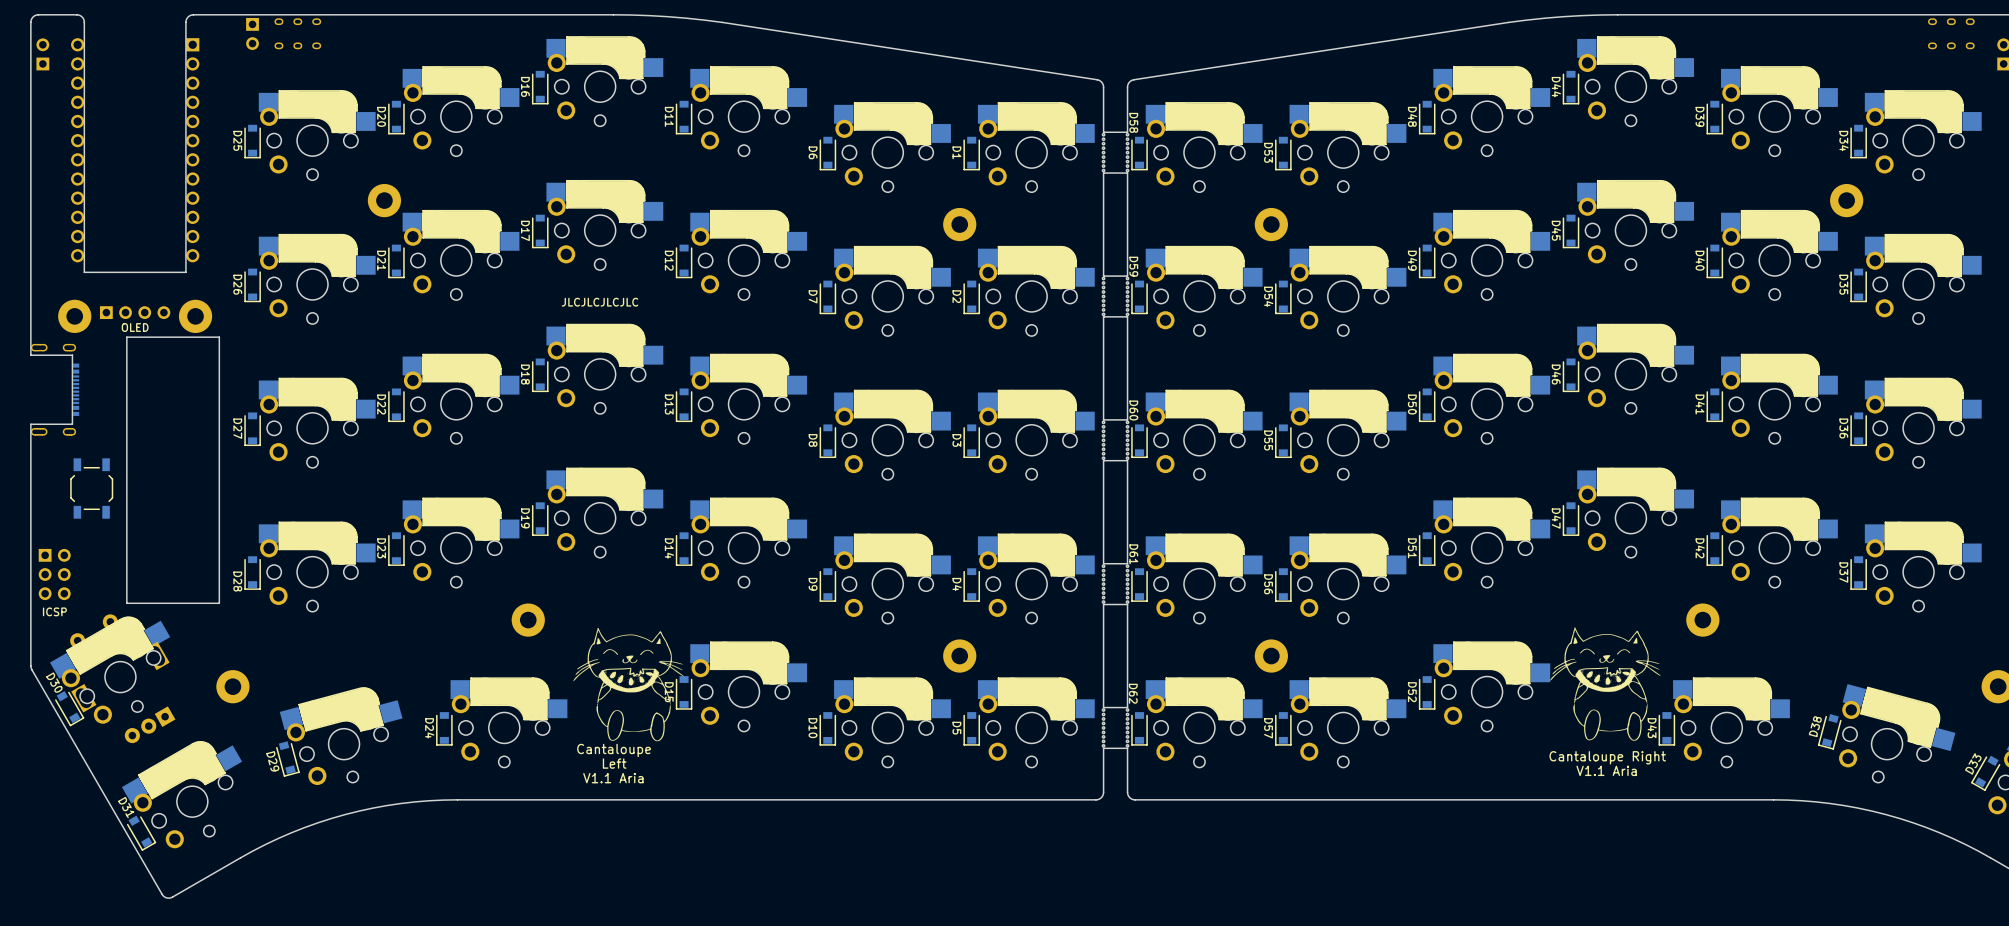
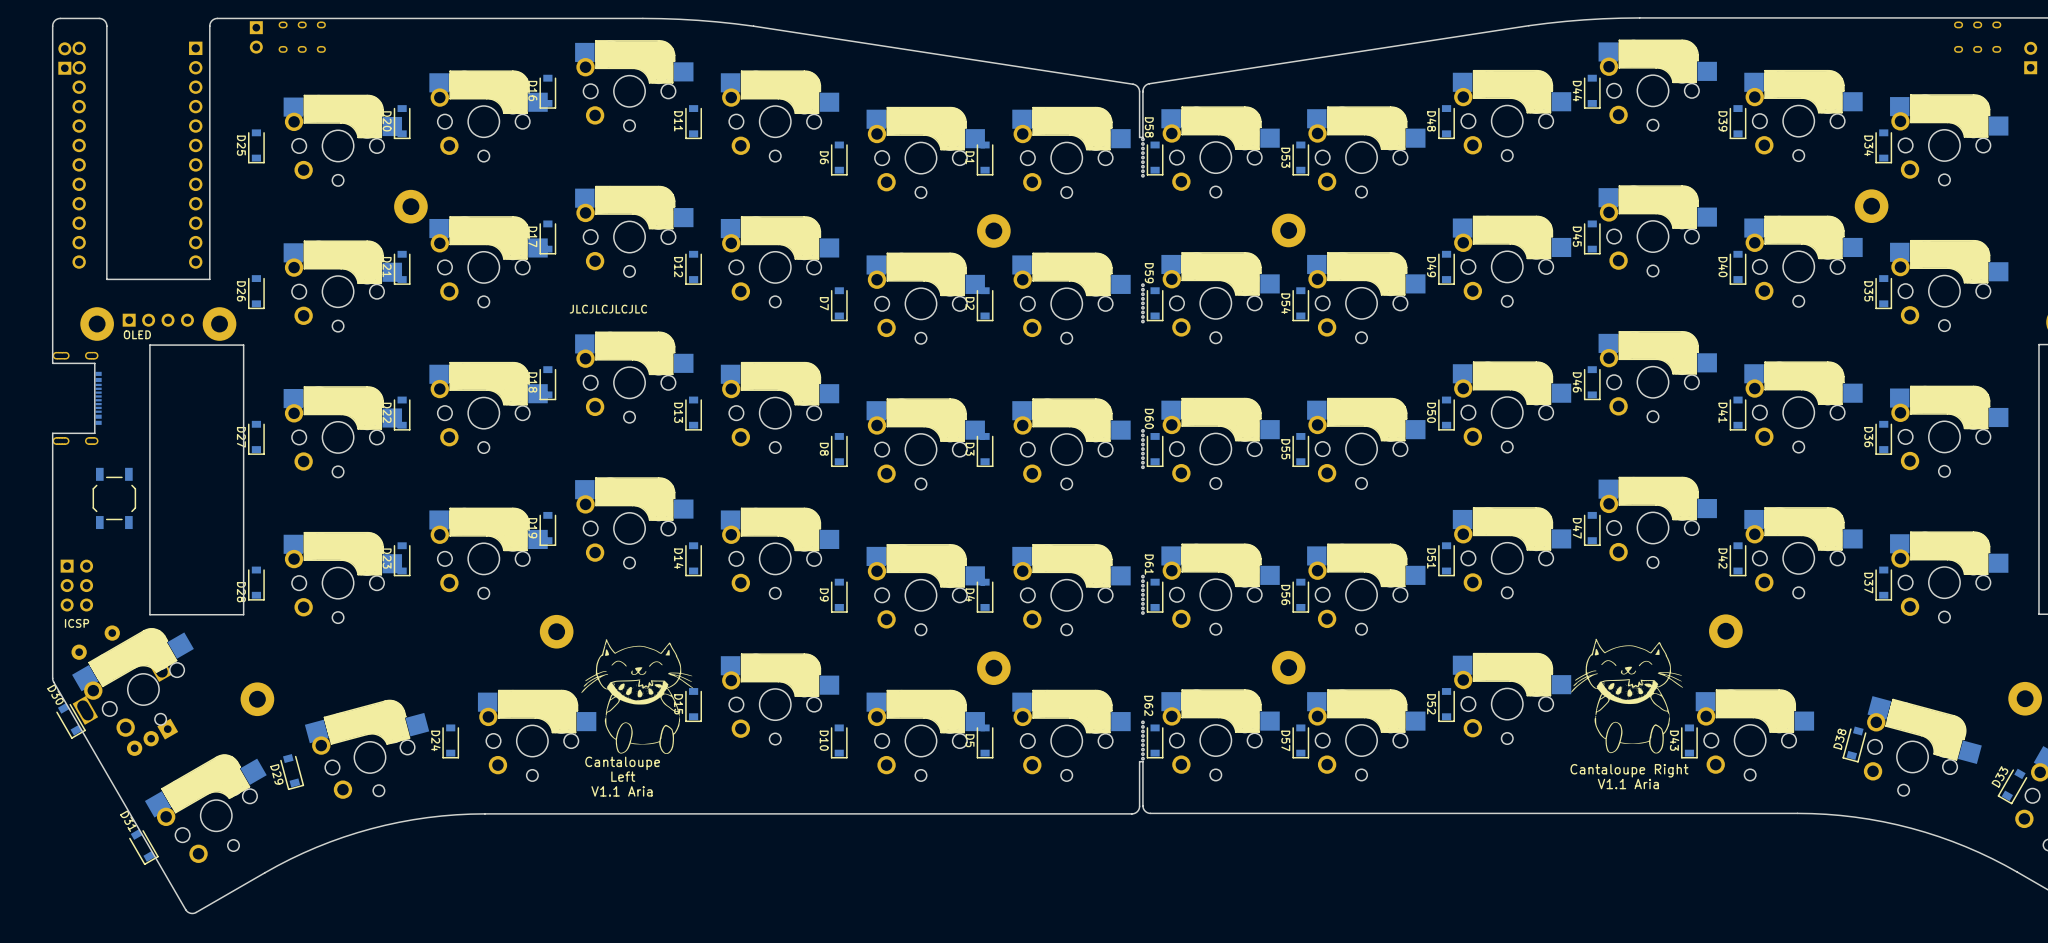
part position: (42, 54) -> (64, 58)
part position: (604, 81) -> (634, 85)
part position: (461, 111) -> (488, 116)
part position: (748, 111) -> (780, 116)
board edge: (1127, 132) (1103, 132) (1103, 86) (1098, 79) (704, 20) (613, 14) (192, 14) (188, 17) (185, 22) (185, 272) (84, 272) (84, 20) (77, 14) (38, 14) (33, 17) (30, 21) (30, 355) (72, 355) (72, 424) (30, 424) (30, 667) (164, 897) (172, 897) (253, 850) (291, 832) (345, 814) (386, 805) (457, 799) (1097, 799) (1101, 797) (1103, 793) (1103, 748) (1127, 748) -> (1142, 136) (1139, 137) (1139, 90) (1133, 84) (735, 23) (642, 18) (216, 18) (212, 20) (209, 26) (209, 279) (106, 279) (106, 24) (100, 18) (60, 18) (54, 20) (52, 25) (52, 363) (94, 363) (94, 433) (52, 433) (52, 679) (187, 911) (196, 912) (277, 865) (316, 847) (371, 828) (413, 819) (484, 813) (1132, 813) (1137, 811) (1139, 807) (1139, 761) (1142, 761)
part position: (317, 135) -> (342, 140)
part position: (892, 147) -> (925, 152)
part position: (1036, 147) -> (1071, 152)
part: (1103, 152) -> none
board edge: (1127, 173) (1103, 173) (1103, 276) (1127, 276) (1127, 173) -> none
part position: (384, 200) -> (410, 206)
part position: (959, 224) -> (993, 230)
part position: (604, 225) -> (634, 231)
part position: (461, 255) -> (488, 261)
part position: (748, 255) -> (780, 261)
part position: (317, 279) -> (342, 286)
part position: (892, 291) -> (925, 298)
part position: (1036, 291) -> (1071, 298)
part: (1103, 296) -> none
part position: (135, 312) -> (158, 320)
part position: (74, 316) -> (97, 324)
part position: (195, 316) -> (219, 324)
board edge: (1127, 316) (1103, 316) (1103, 419) (1127, 419) (1127, 316) -> none
part position: (604, 368) -> (634, 377)
part position: (54, 389) -> (77, 398)
part position: (461, 398) -> (488, 407)
part position: (748, 398) -> (780, 407)
part position: (317, 422) -> (342, 431)
part position: (892, 434) -> (925, 444)
part position: (1036, 434) -> (1071, 444)
part: (1103, 440) -> none
board edge: (1127, 460) (1103, 460) (1103, 563) (1127, 563) (1127, 460) -> none
drawing position: (173, 470) -> (196, 479)
part position: (91, 488) -> (114, 498)
part position: (604, 512) -> (634, 523)
part position: (461, 542) -> (488, 553)
part position: (748, 542) -> (780, 553)
part position: (317, 566) -> (342, 577)
part position: (54, 574) -> (76, 585)
part position: (892, 578) -> (925, 589)
part position: (1036, 578) -> (1071, 589)
part: (1103, 584) -> none
board edge: (1127, 604) (1103, 604) (1103, 707) (1127, 707) (1127, 604) -> none
part position: (528, 620) -> (556, 631)
part position: (959, 656) -> (993, 668)
part position: (110, 670) -> (132, 682)
part position: (232, 686) -> (257, 699)
part position: (748, 686) -> (780, 699)
part position: (508, 722) -> (537, 735)
part position: (892, 722) -> (925, 735)
part position: (1036, 722) -> (1071, 735)
part: (1103, 727) -> none
part position: (341, 736) -> (367, 749)
part position: (182, 794) -> (205, 808)

